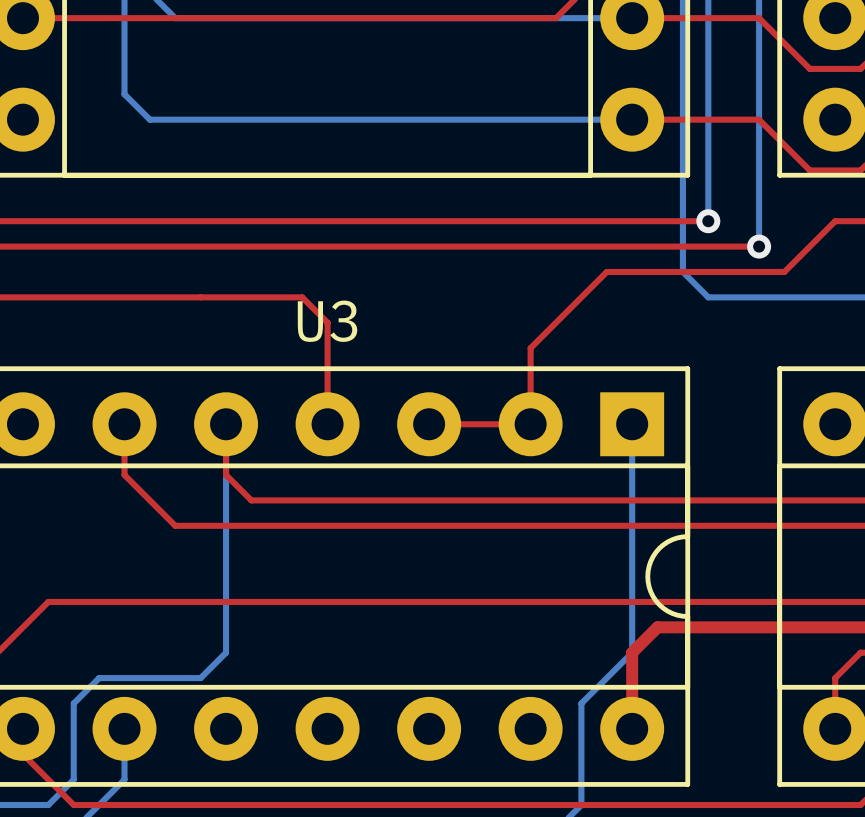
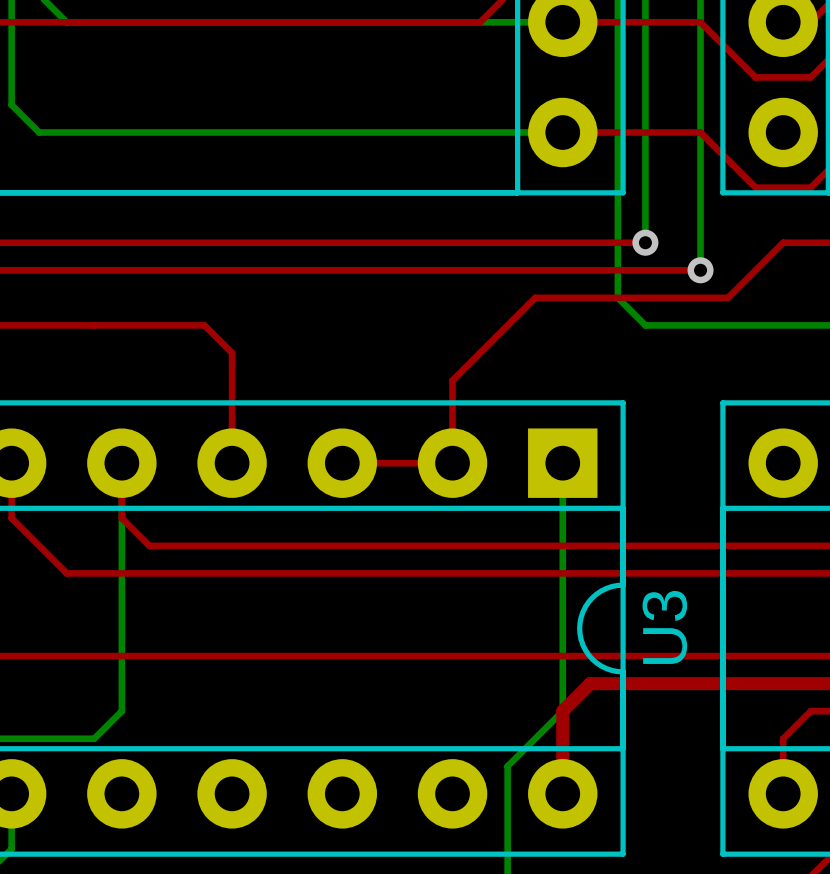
U3 name rotation: 0° (327, 321) -> 90° counterclockwise (664, 627)
U3 name position: U3 (327, 321) -> U3 (664, 627)

